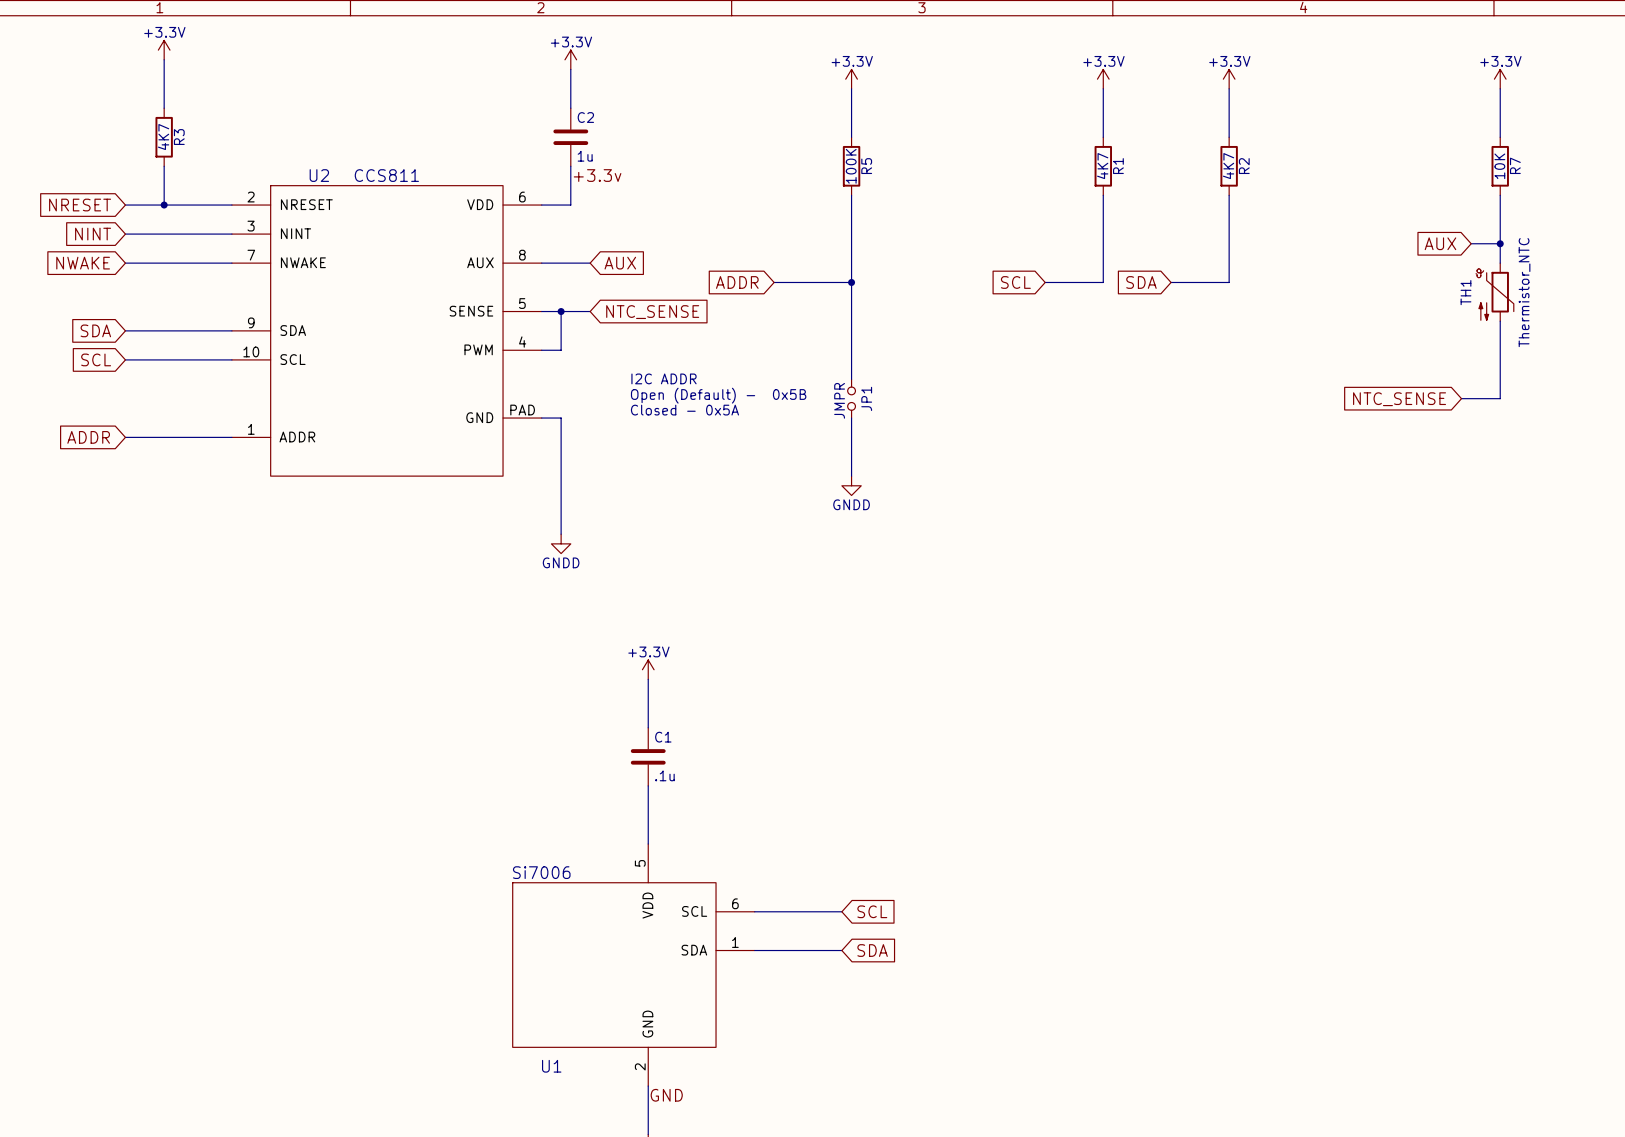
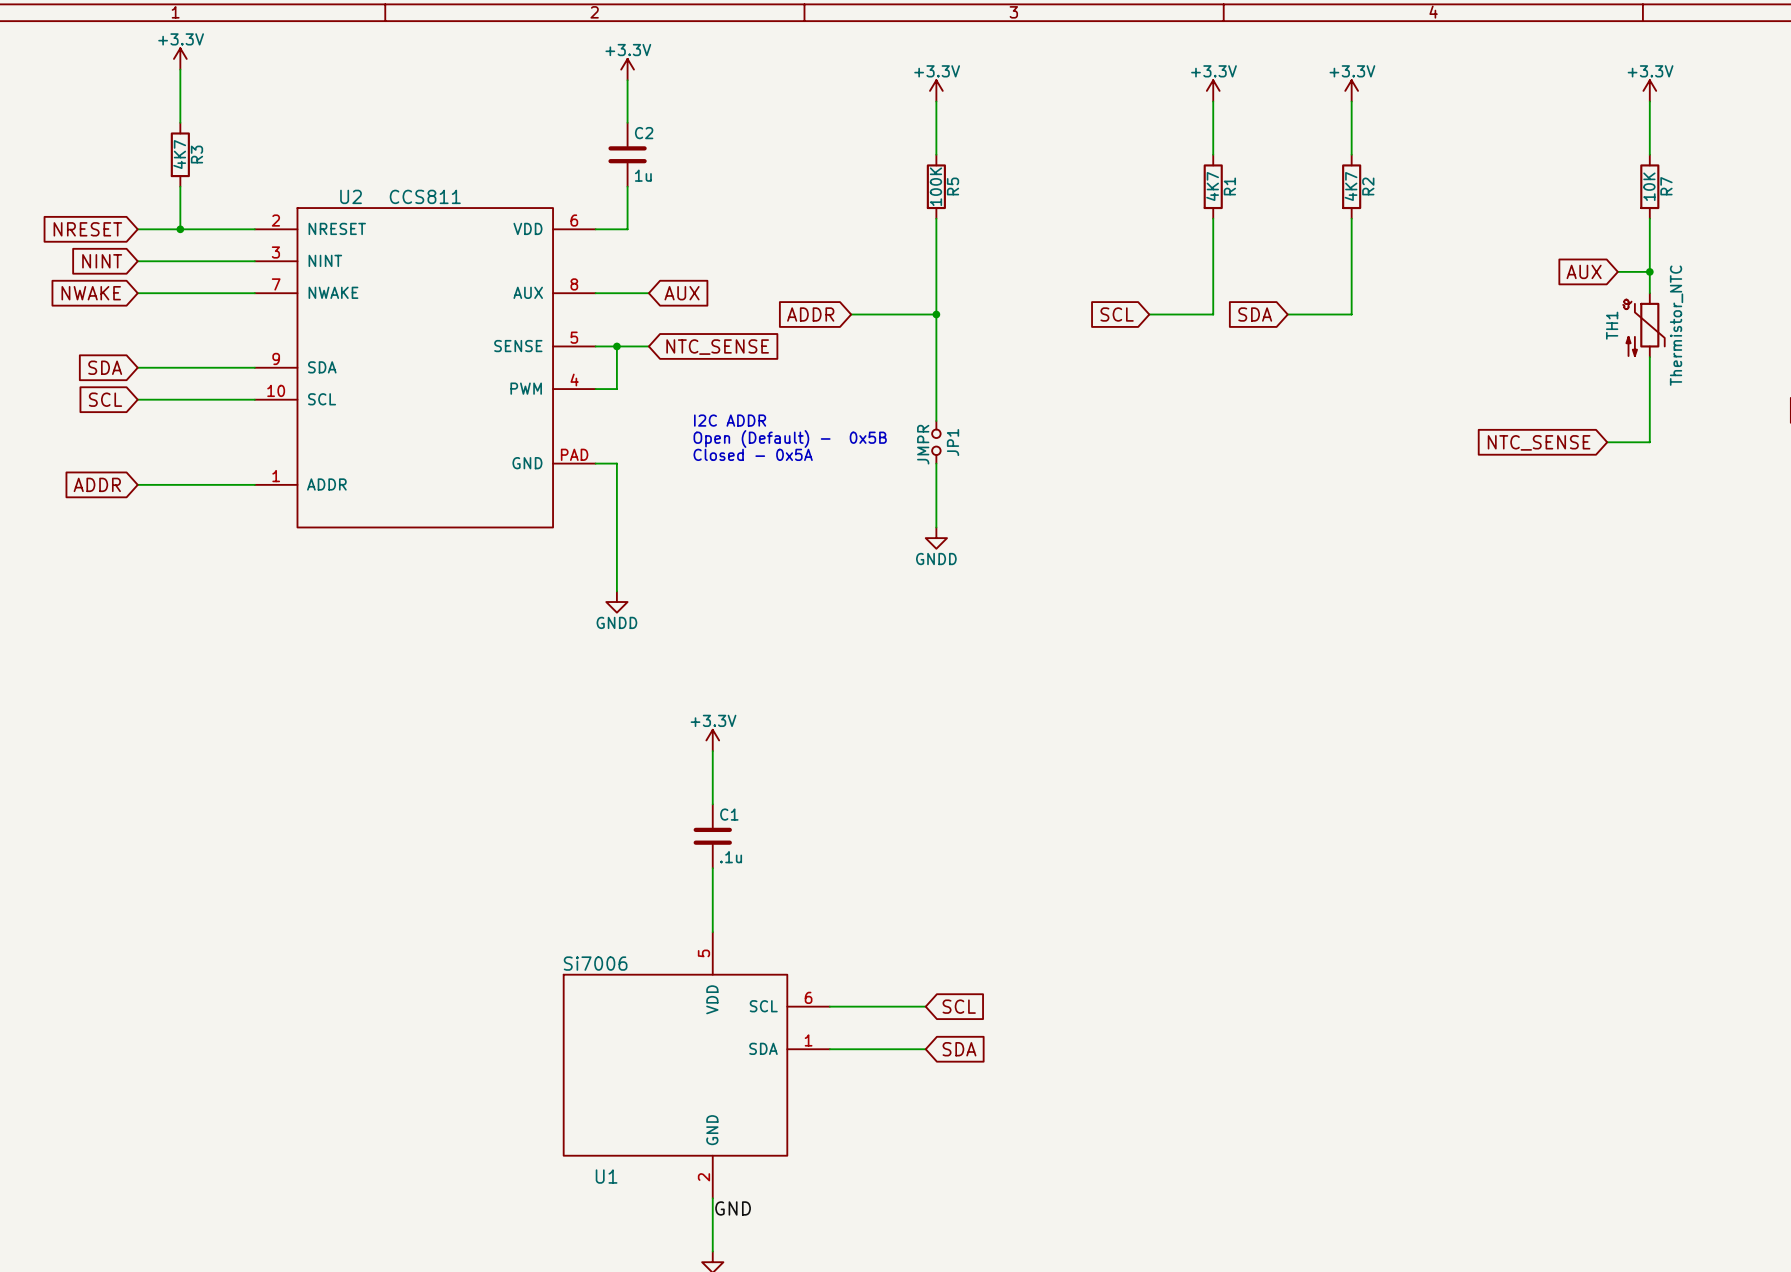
label: +3.3v (597, 175) -> none

